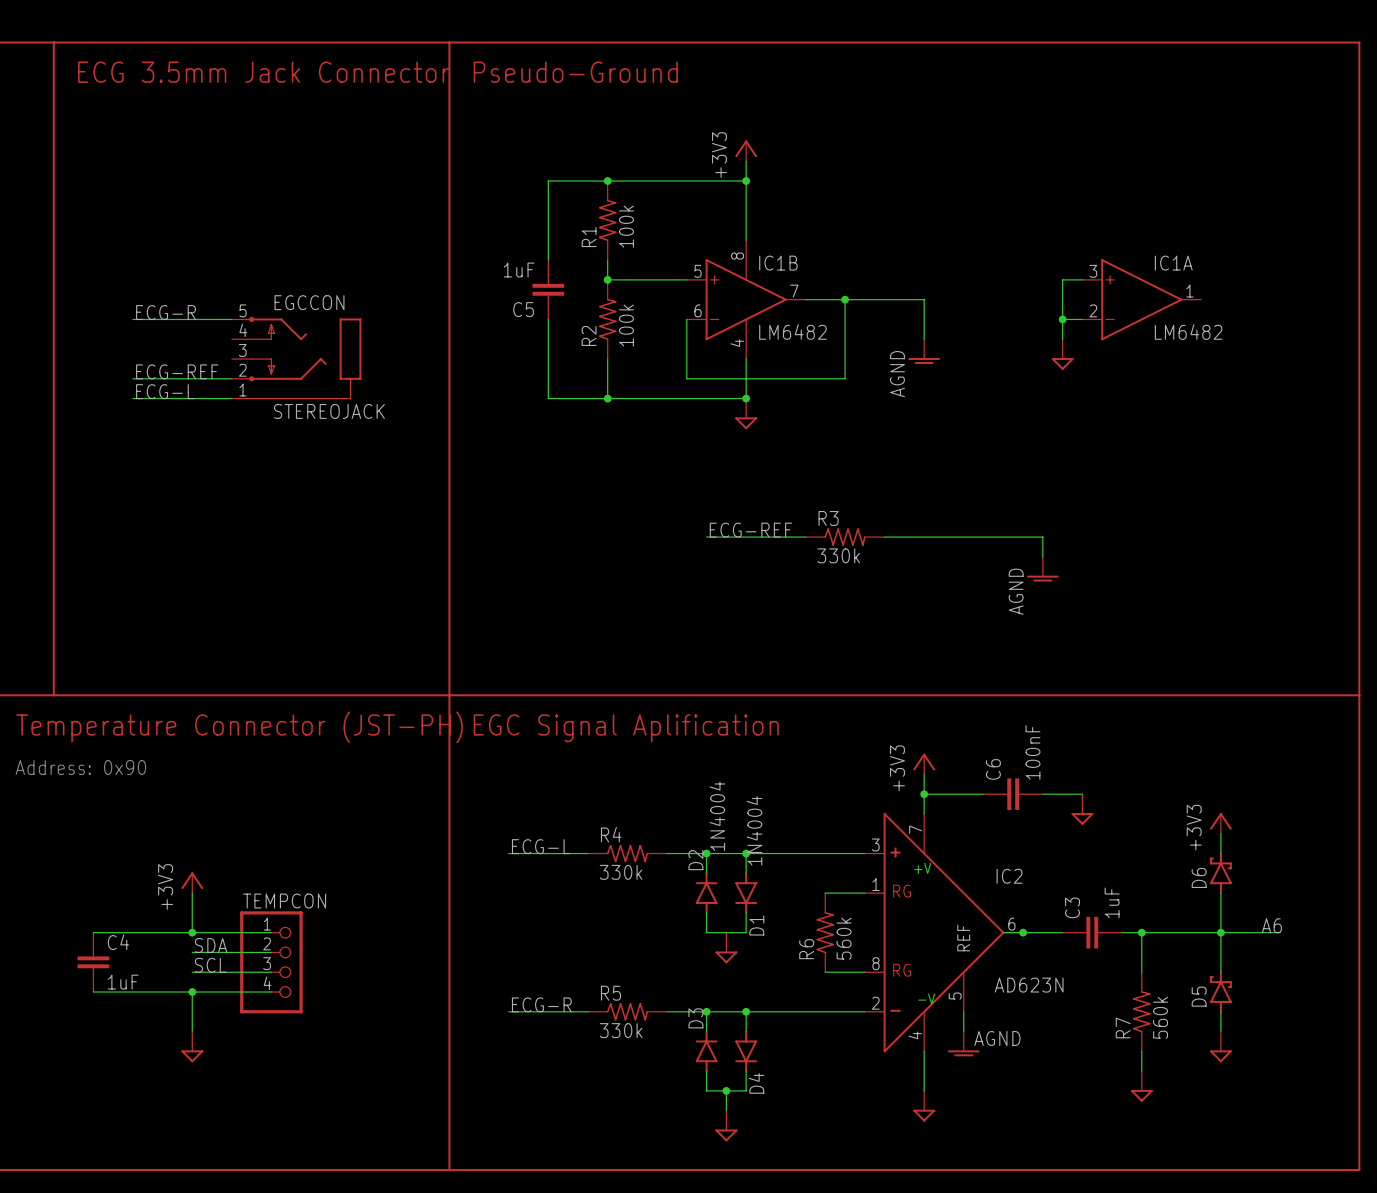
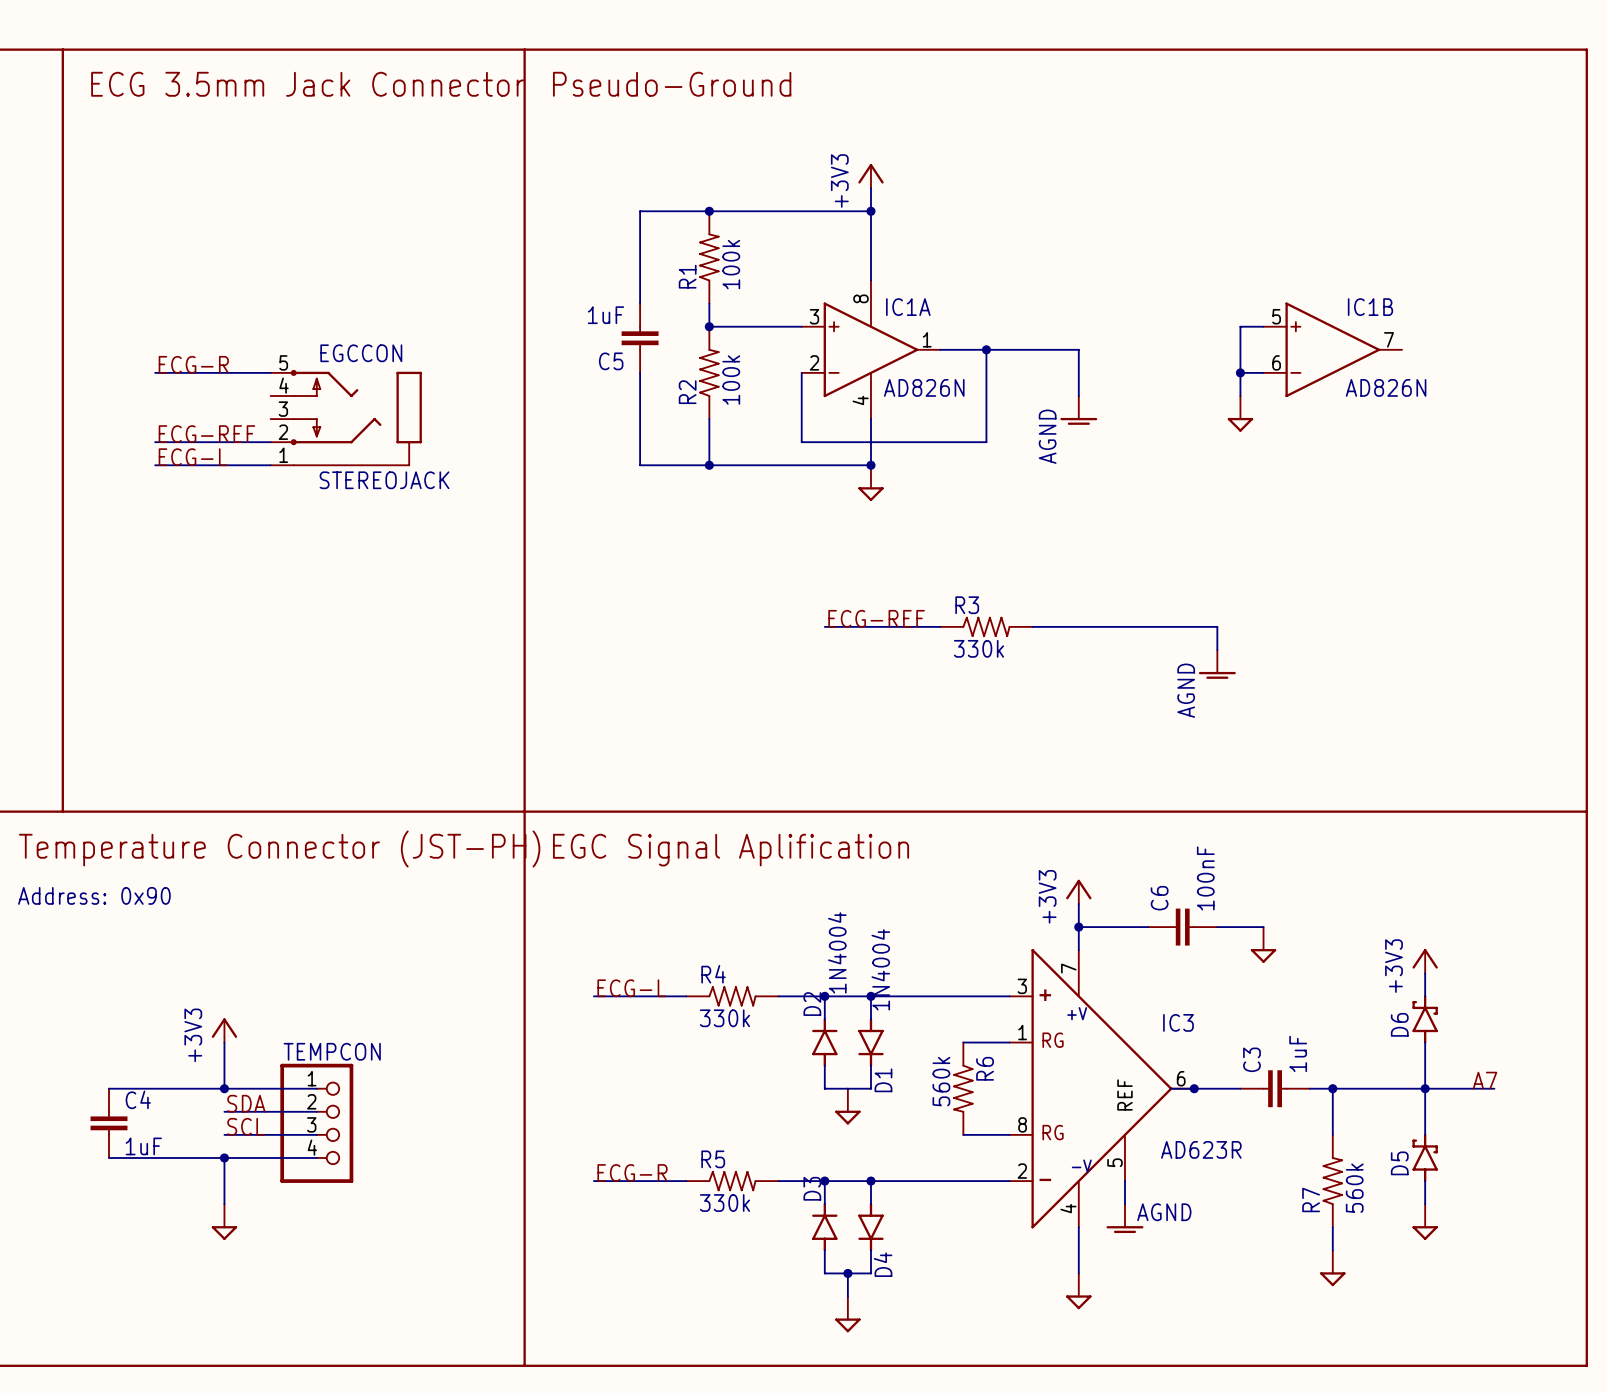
IC1B position: (746, 299) -> (1332, 349)
IC1A position: (1141, 299) -> (870, 349)
IC1B value: LM6482 (792, 331) -> AD826N (1386, 387)
IC1A value: LM6482 (1188, 331) -> AD826N (924, 387)
IC2 name: IC2 (1009, 876) -> IC3 (1178, 1022)
label: A6 (1271, 925) -> A7 (1485, 1080)
R6 rotation: 0° (825, 932) -> 180° (963, 1088)
IC2 value: AD623N (1029, 985) -> AD623R (1201, 1149)

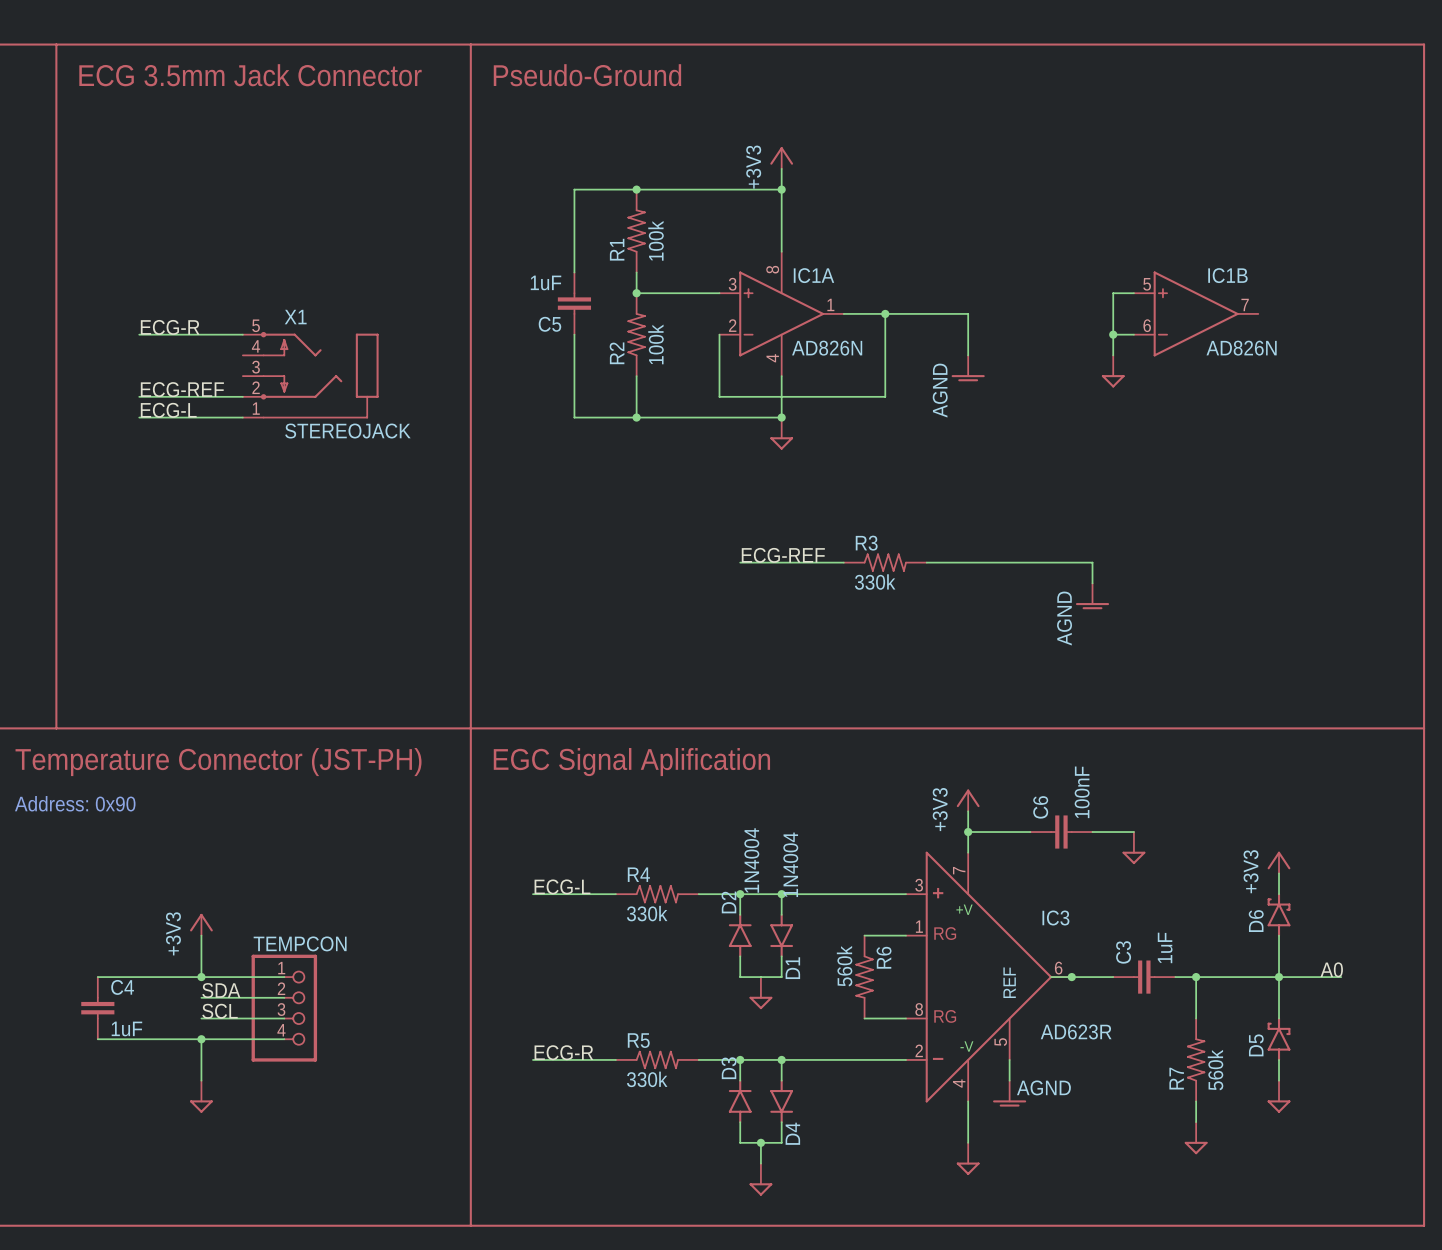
EGCCON name: EGCCON (361, 353) -> X1 (295, 317)
label: A7 (1485, 1080) -> A0 (1331, 969)

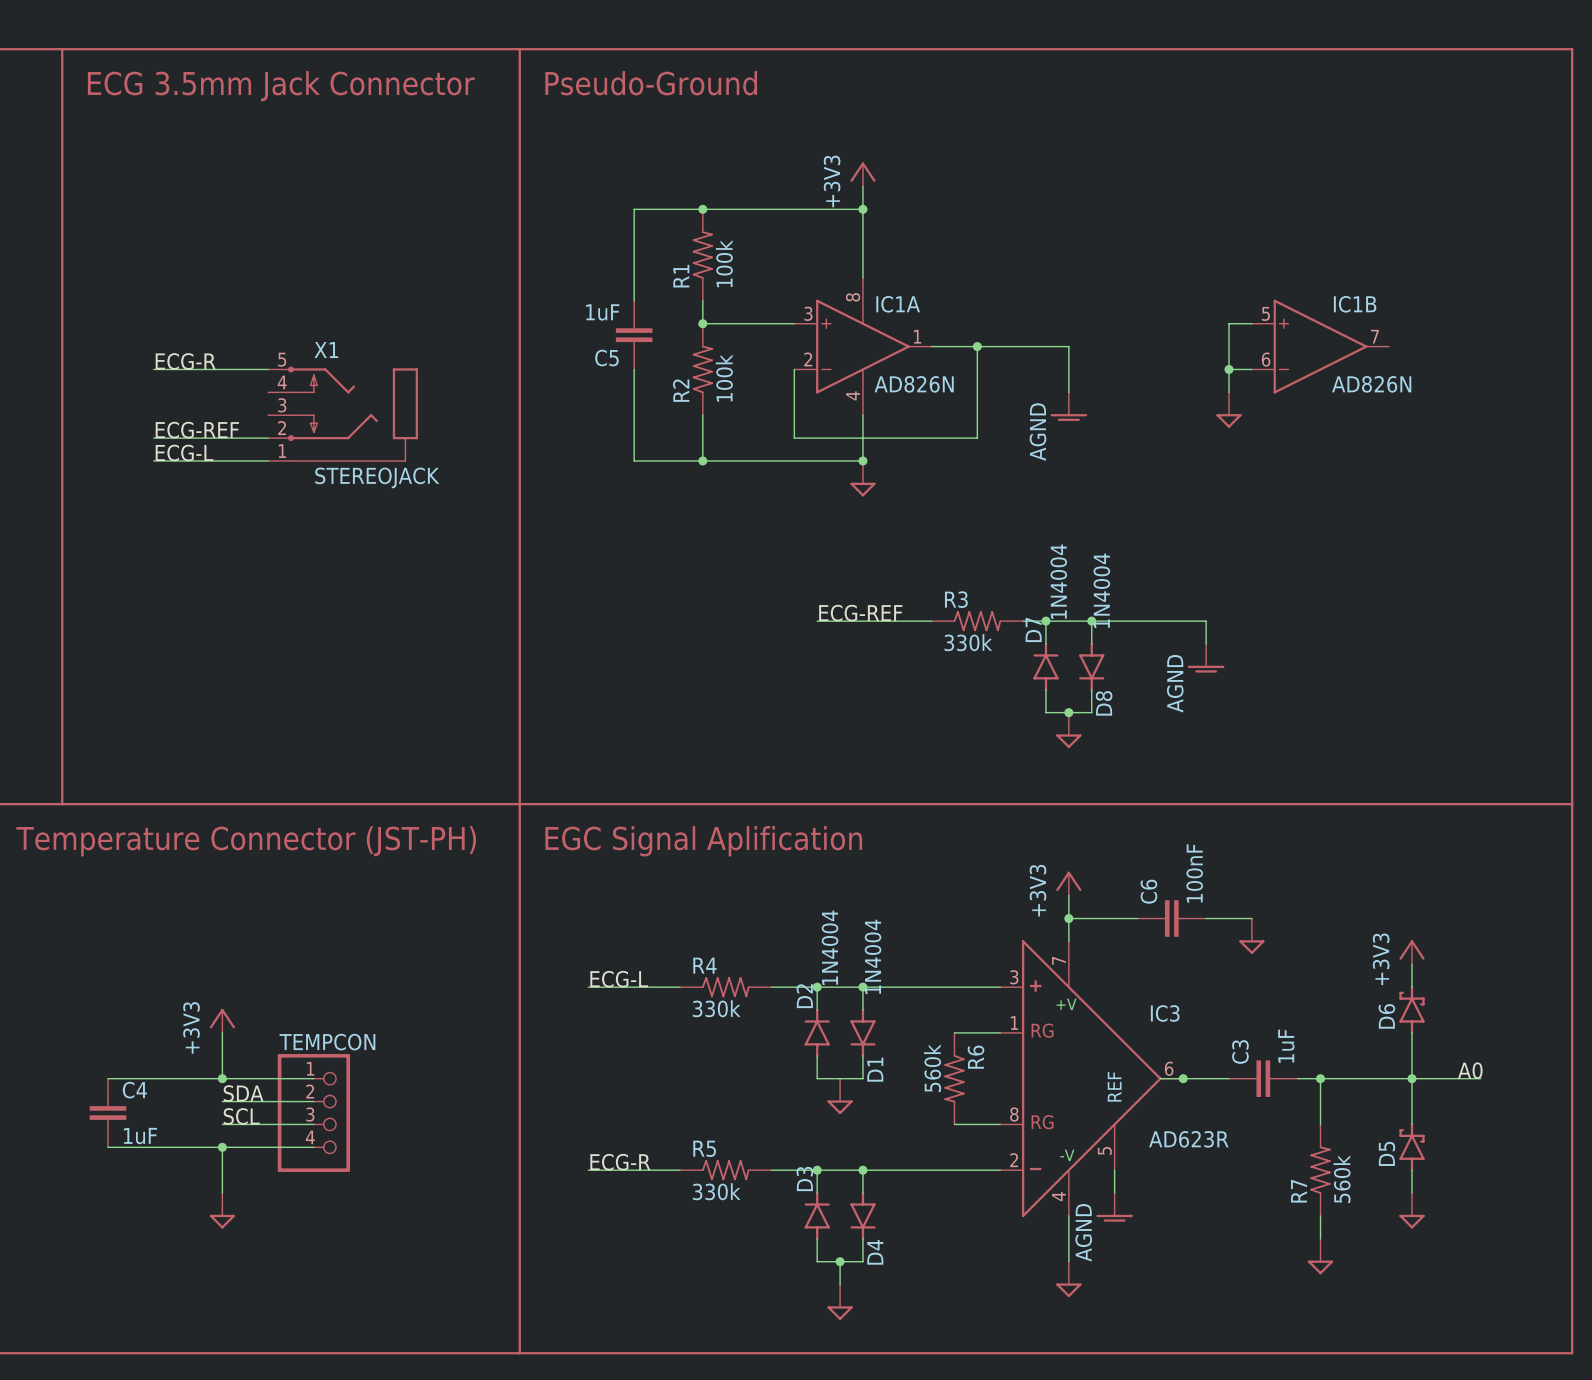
wire: none -> (1045, 621) (1045, 644)
junction: none -> (1045, 621)
wire: none -> (1091, 621) (1091, 644)
junction: none -> (1091, 621)
D7: none -> 1N4004 (1045, 666)
D8: none -> 1N4004 (1091, 666)
wire: none -> (1045, 689) (1045, 712) (1091, 712) (1091, 689)
junction: none -> (1068, 712)
power symbol: none -> (1068, 730)
text: Address: 0x90 (75, 803) -> none
power symbol text rotation: 0° (1043, 1087) -> 90° counterclockwise (1083, 1232)

